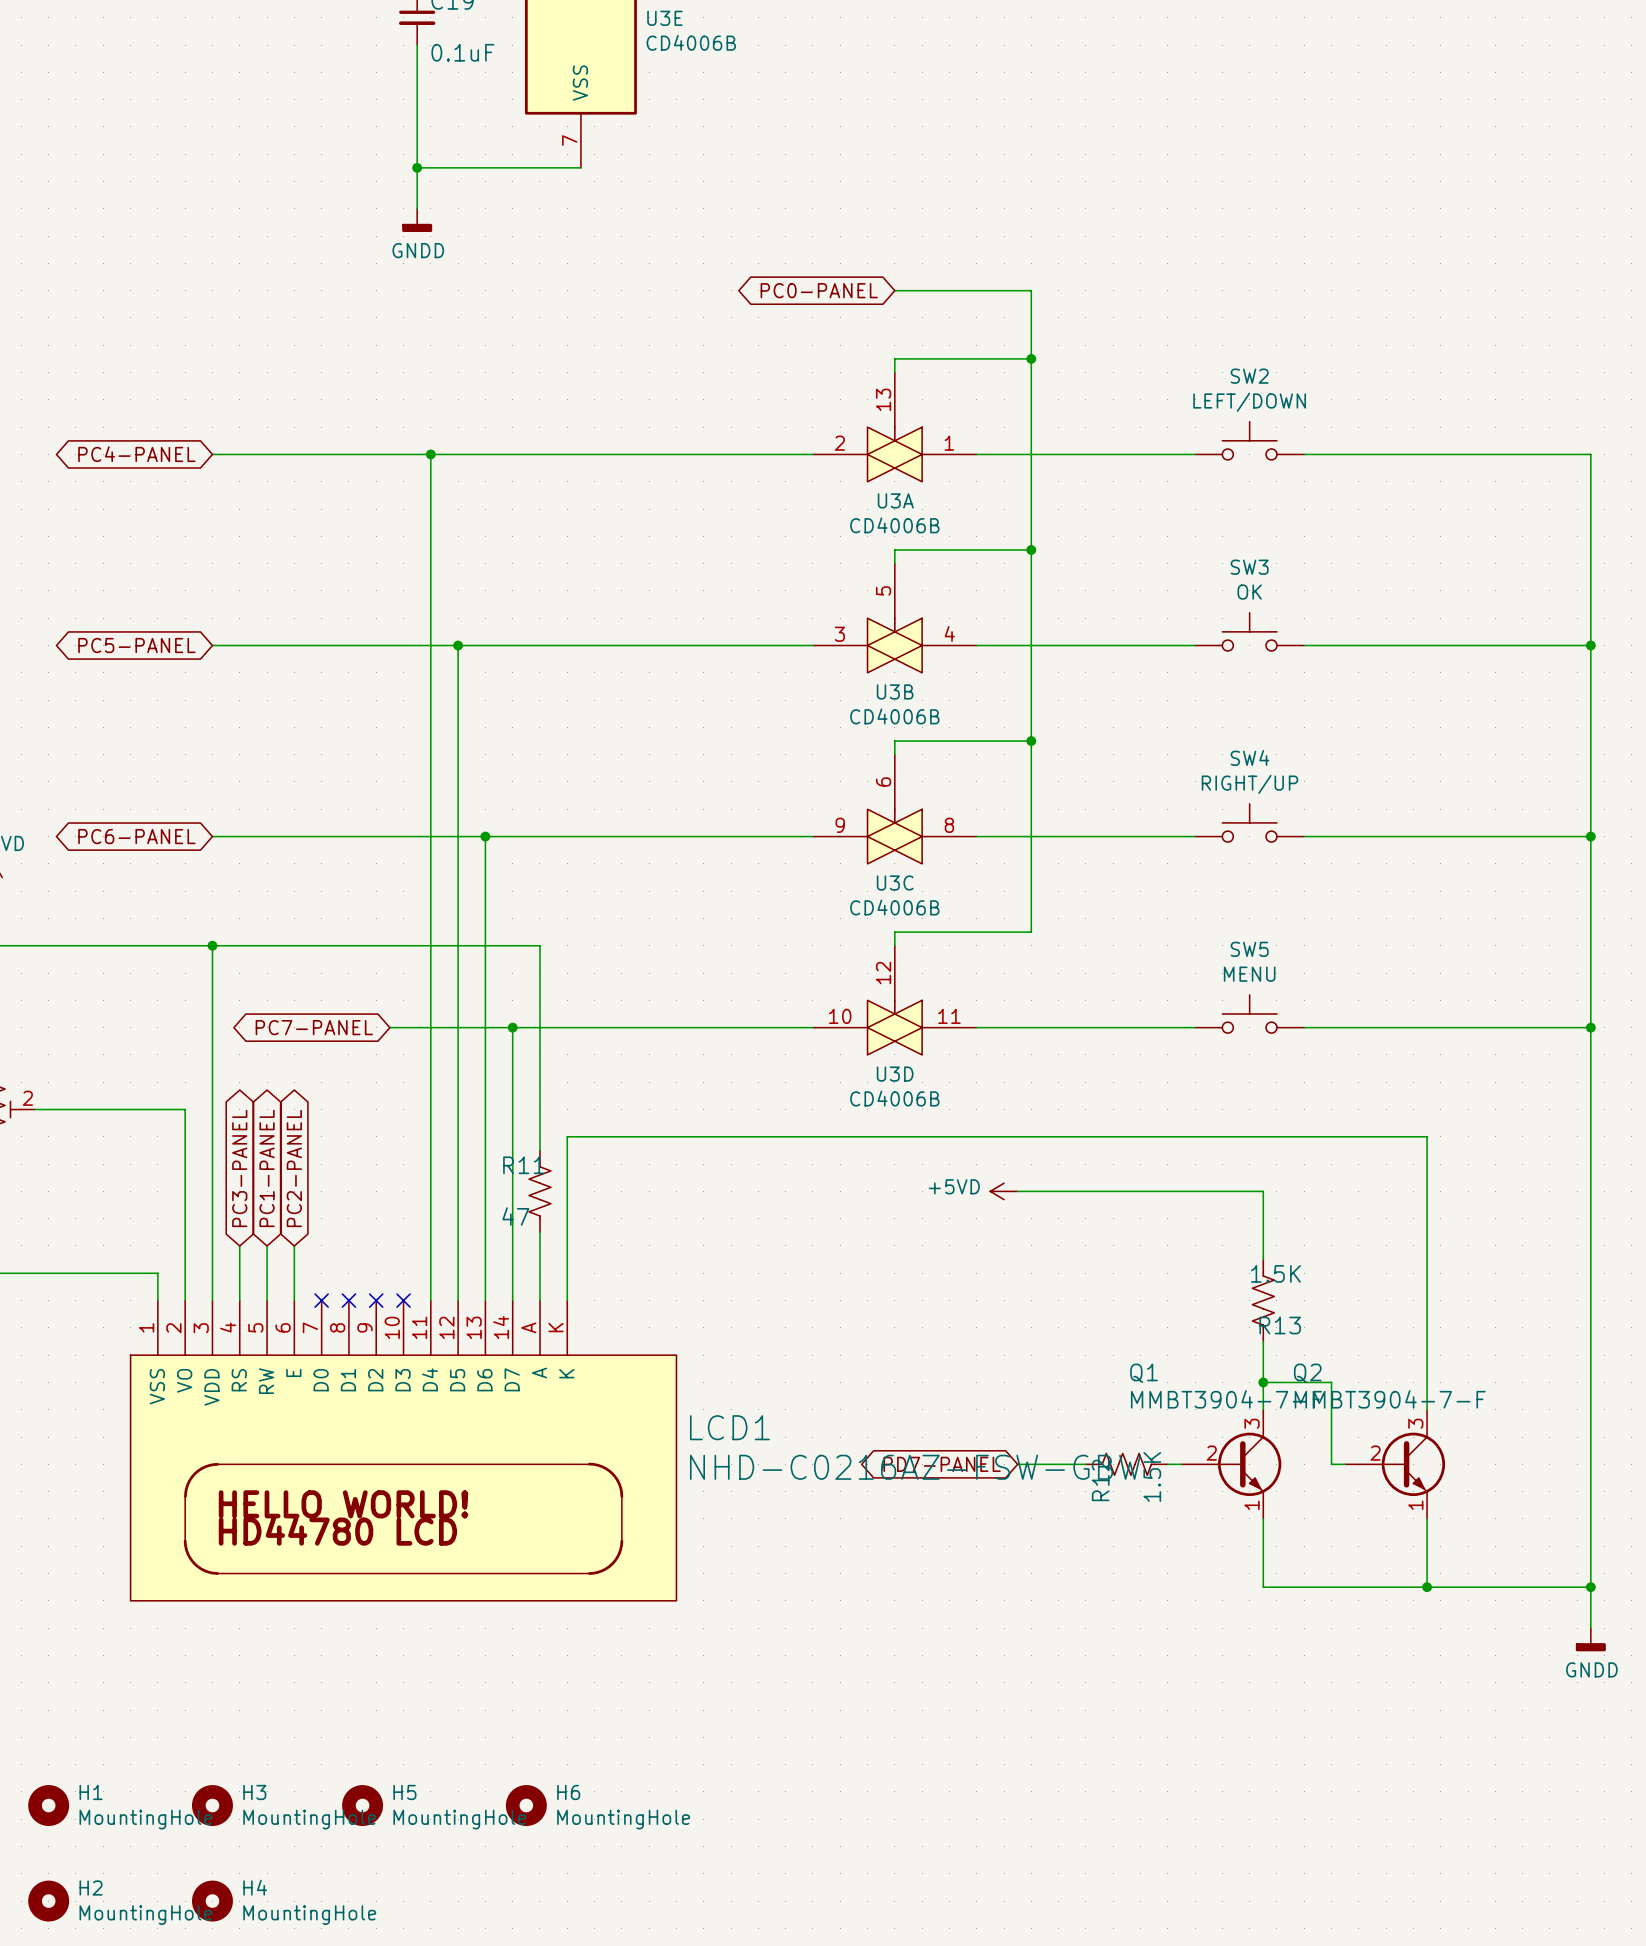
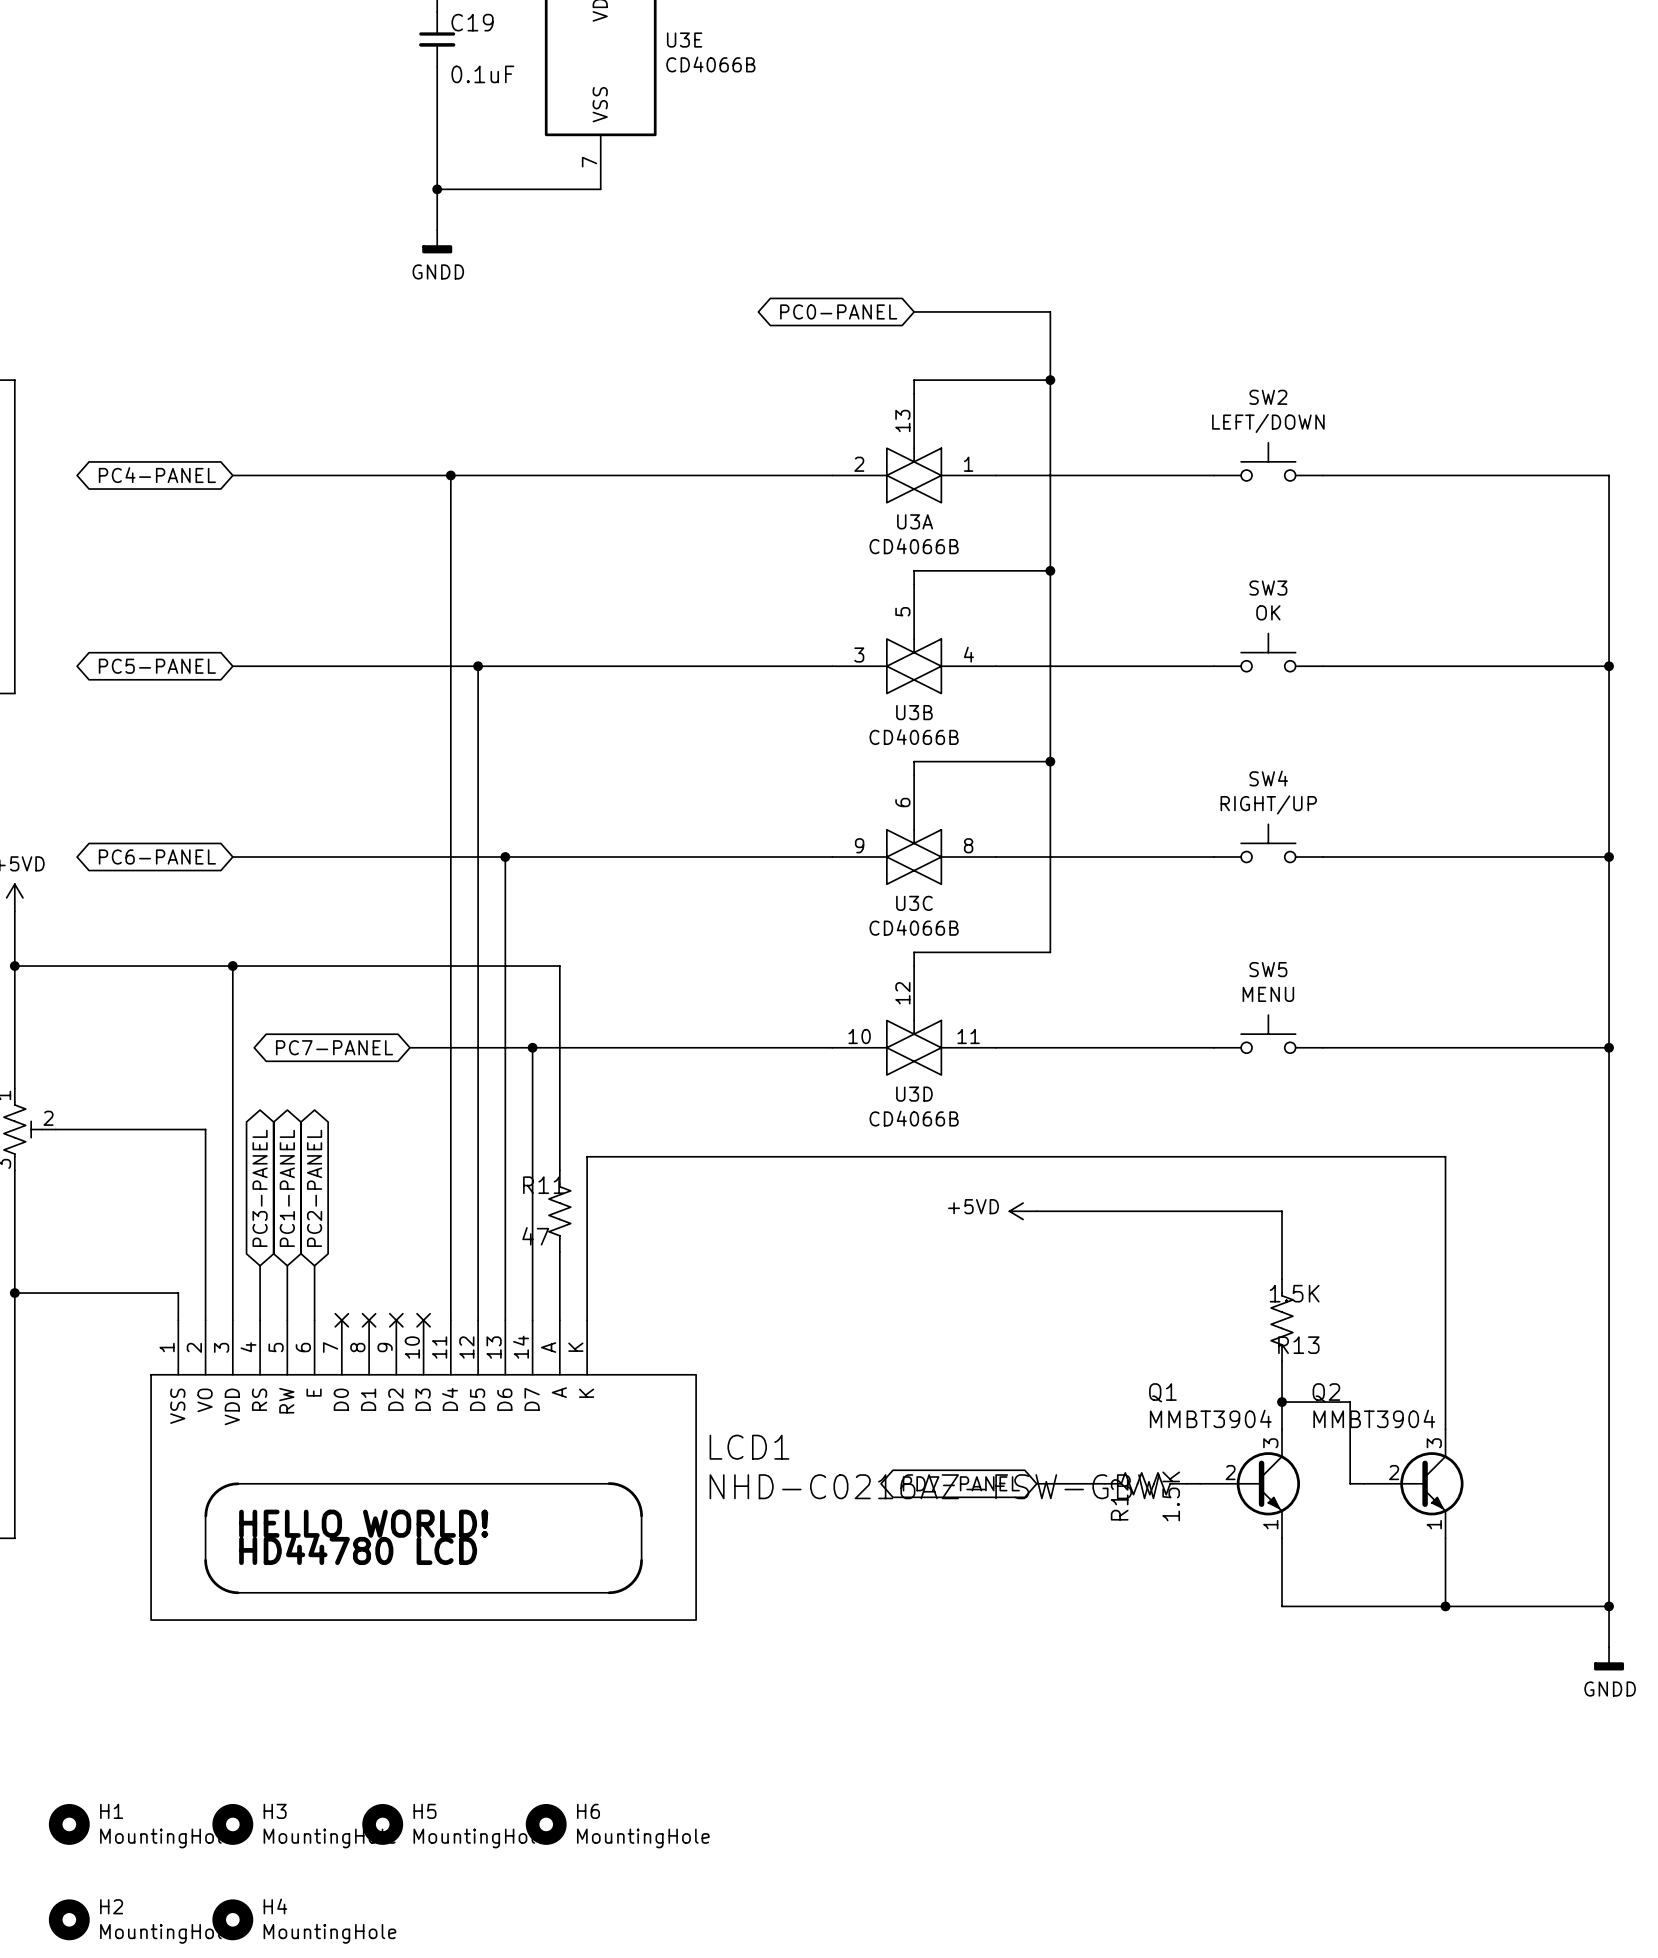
U3E value: CD4006B (691, 42) -> CD4066B (710, 64)
U3A value: CD4006B (894, 525) -> CD4066B (914, 546)
U3B value: CD4006B (894, 716) -> CD4066B (914, 737)
U3C value: CD4006B (894, 907) -> CD4066B (914, 927)
U3D value: CD4006B (894, 1098) -> CD4066B (914, 1118)
Q1 value: MMBT3904-7-F (1226, 1399) -> MMBT3904 (1210, 1418)
Q2 value: MMBT3904-7-F (1390, 1399) -> MMBT3904 (1374, 1418)

